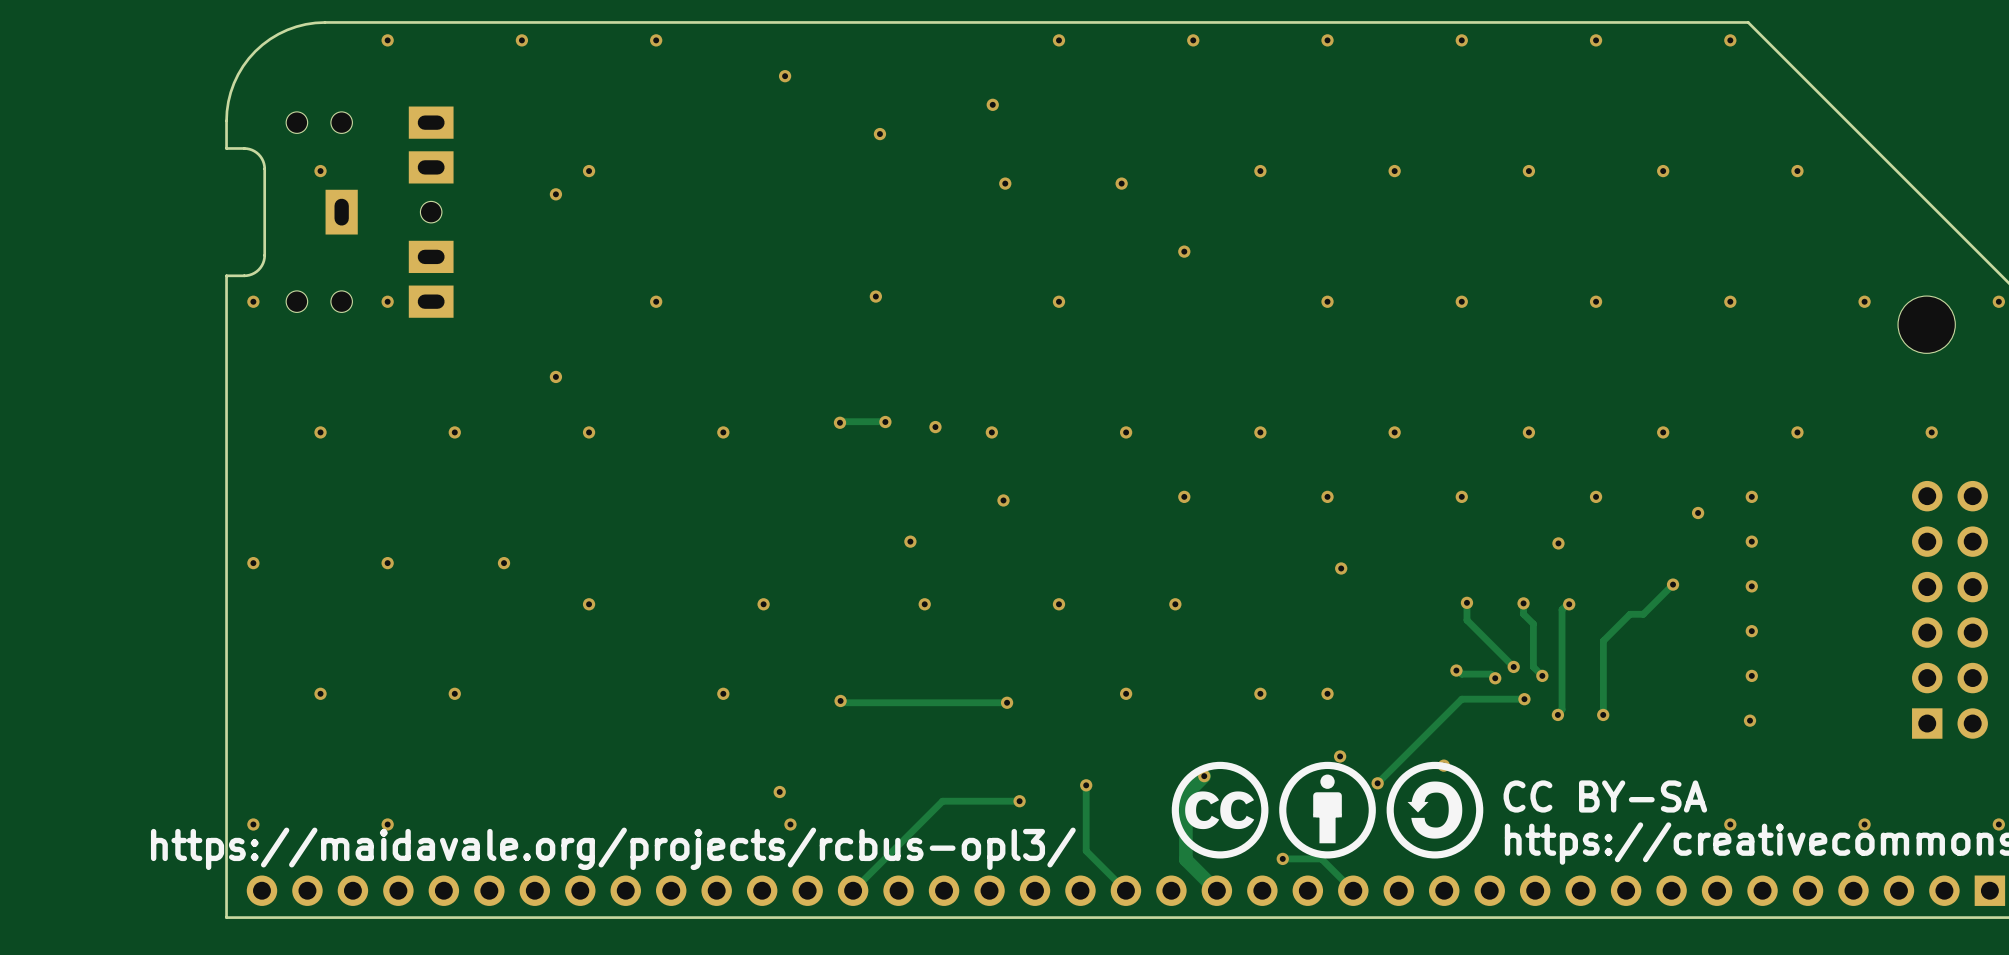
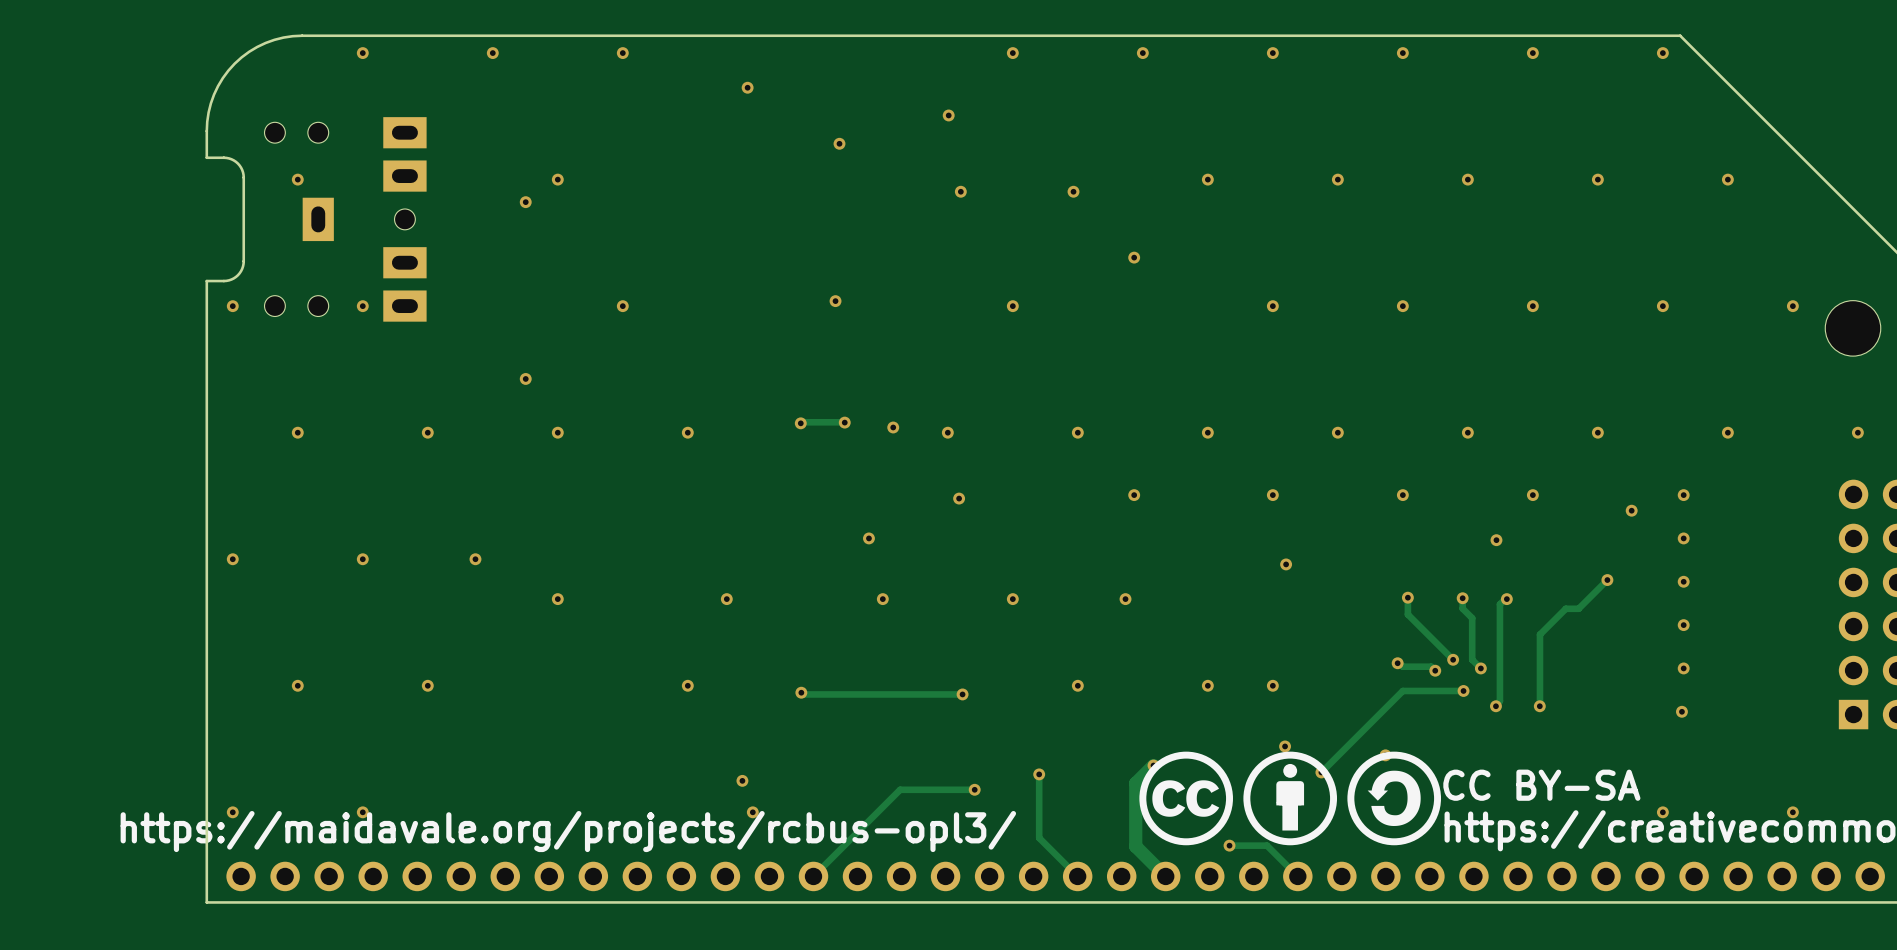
drawing position: (1220, 810) -> (1186, 798)
drawing position: (1327, 810) -> (1290, 798)
drawing position: (1434, 810) -> (1394, 798)
text position: https://maidavale.org/projects/rcbus-opl3/ (613, 848) -> https://maidavale.org/projects/rcbus-opl3/ (568, 831)

